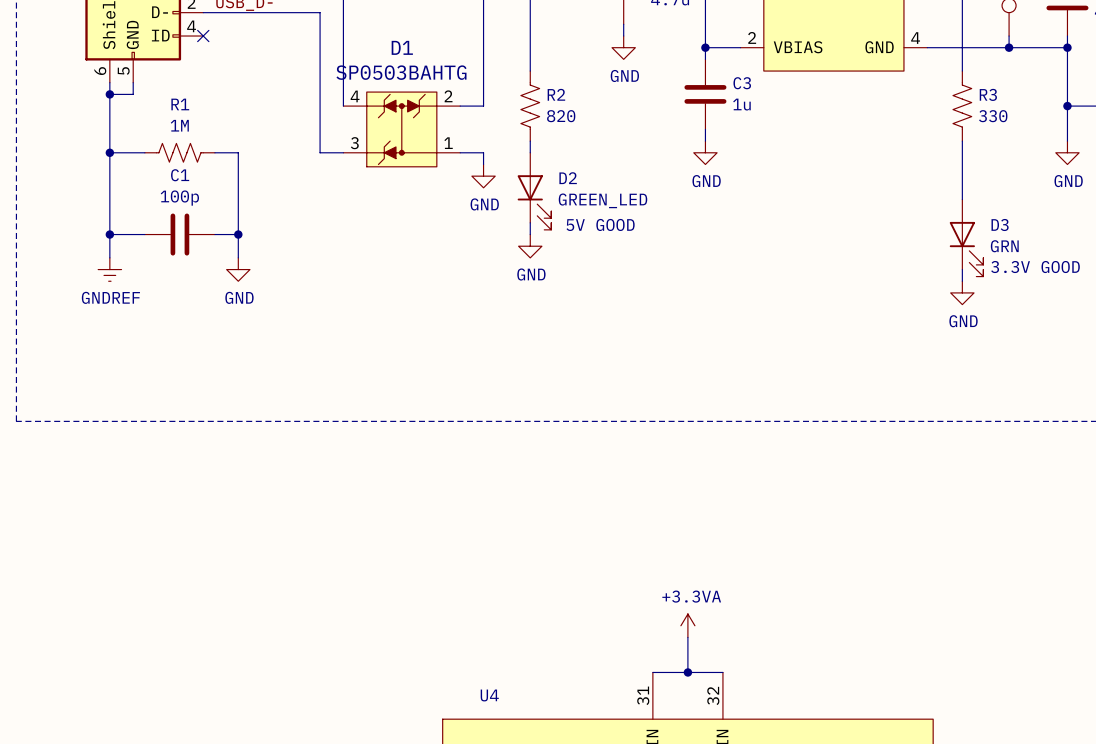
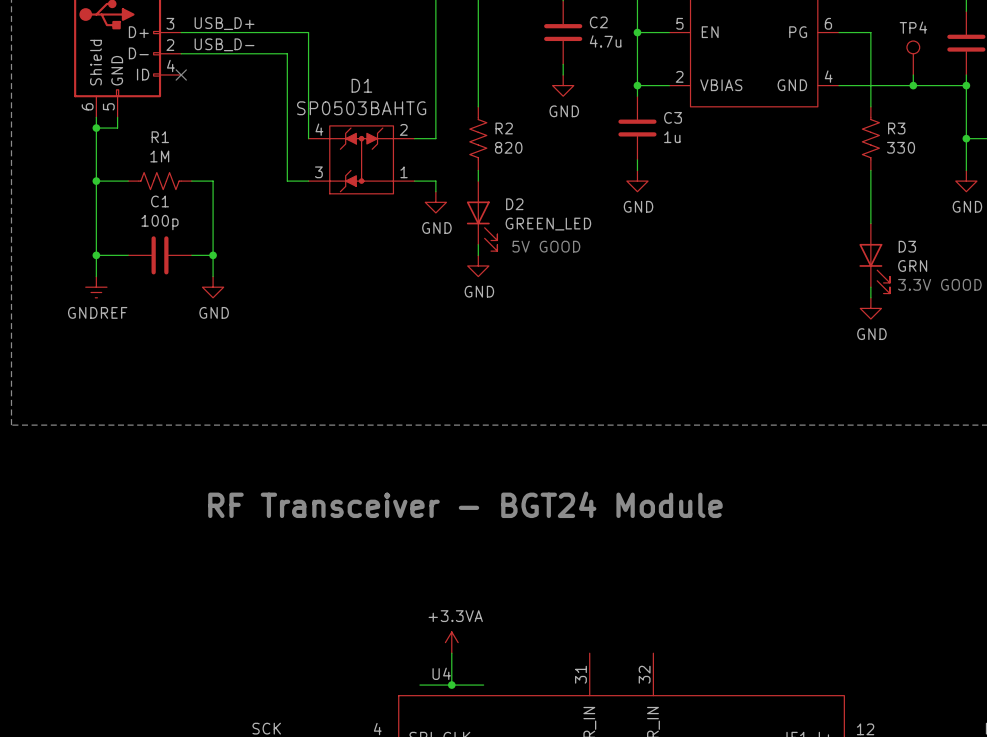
text: none -> RF Transceiver - BGT24 Module (465, 504)
power symbol position: +3.3VA (687, 625) -> +3.3VA (451, 642)
wire: (687, 637) (687, 672) -> (451, 653) (451, 685)
wire: (652, 672) (722, 672) -> (419, 685) (483, 685)
junction: (687, 672) -> none
junction: none -> (451, 685)

